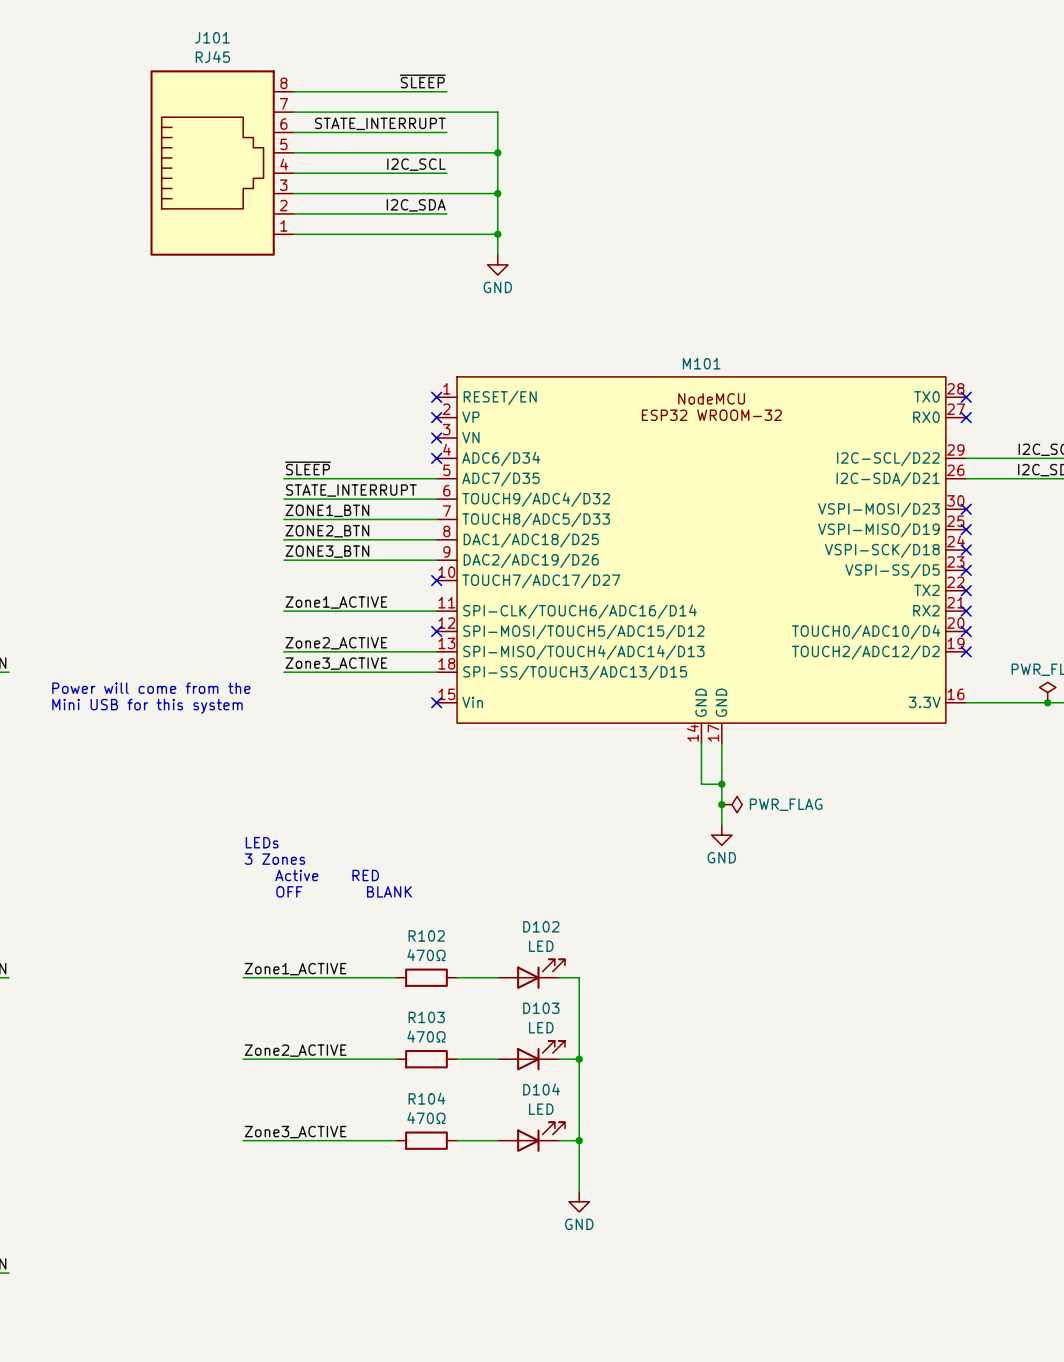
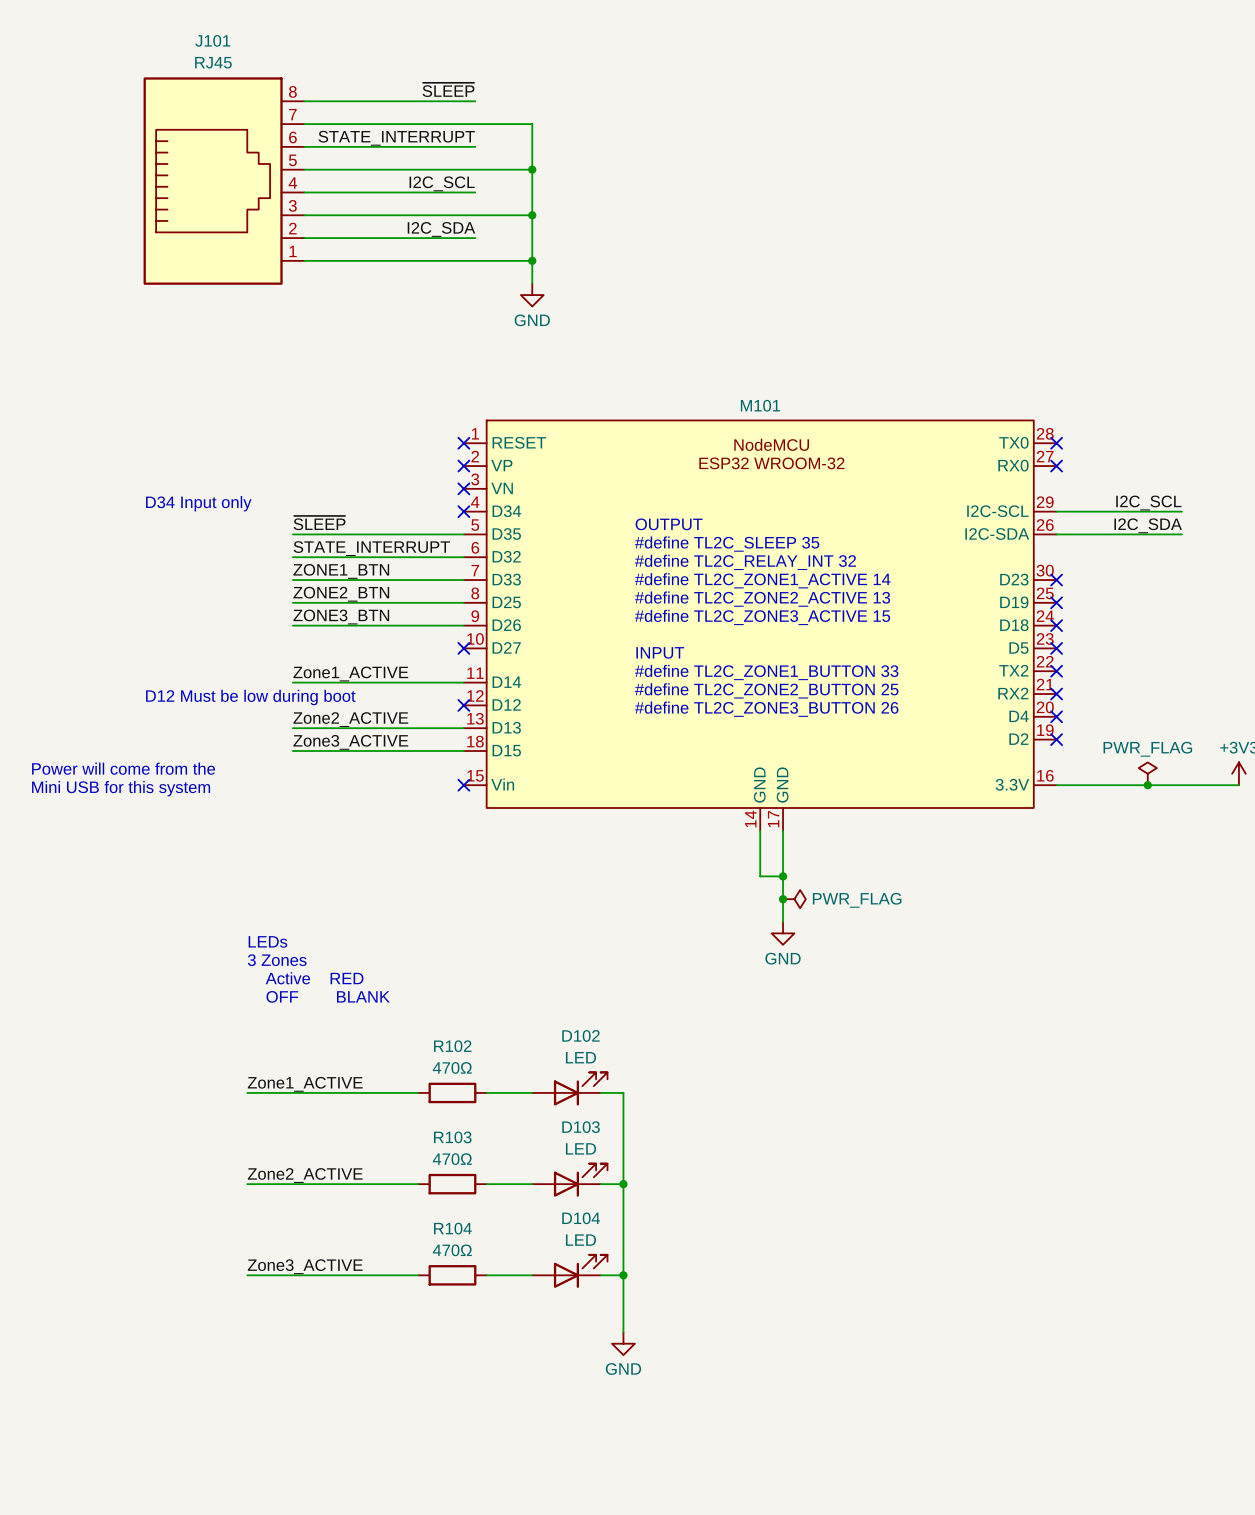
M101 symbol: [436, 376, 967, 744] -> [463, 420, 1057, 831]
text: none -> D34 Input only (198, 503)
text: none -> OUTPUT (669, 524)
text: none -> #define TL2C_SLEEP 35 (727, 544)
text: none -> #define TL2C_RELAY_INT 32 (745, 562)
no-connect mark: (966, 509) -> none
text: none -> #define TL2C_ZONE1_ACTIVE 14 (762, 580)
no-connect mark: none -> (1056, 580)
no-connect mark: (966, 529) -> none
text: none -> #define TL2C_ZONE2_ACTIVE 13 (762, 599)
no-connect mark: none -> (1056, 602)
no-connect mark: (966, 550) -> none
text: none -> #define TL2C_ZONE3_ACTIVE 15 (762, 617)
no-connect mark: none -> (1056, 625)
no-connect mark: (966, 570) -> none
no-connect mark: none -> (1056, 648)
text: none -> INPUT (660, 652)
no-connect mark: (966, 590) -> none
no-connect mark: none -> (1056, 671)
text: none -> #define TL2C_ZONE1_BUTTON 33 (766, 672)
no-connect mark: (966, 611) -> none
text: none -> #define TL2C_ZONE2_BUTTON 25 (766, 690)
no-connect mark: none -> (1056, 694)
text: none -> D12 Must be low during boot (250, 697)
no-connect mark: (966, 631) -> none
text: none -> #define TL2C_ZONE3_BUTTON 26 (766, 709)
no-connect mark: none -> (1056, 716)
no-connect mark: (966, 651) -> none
no-connect mark: none -> (1056, 739)

